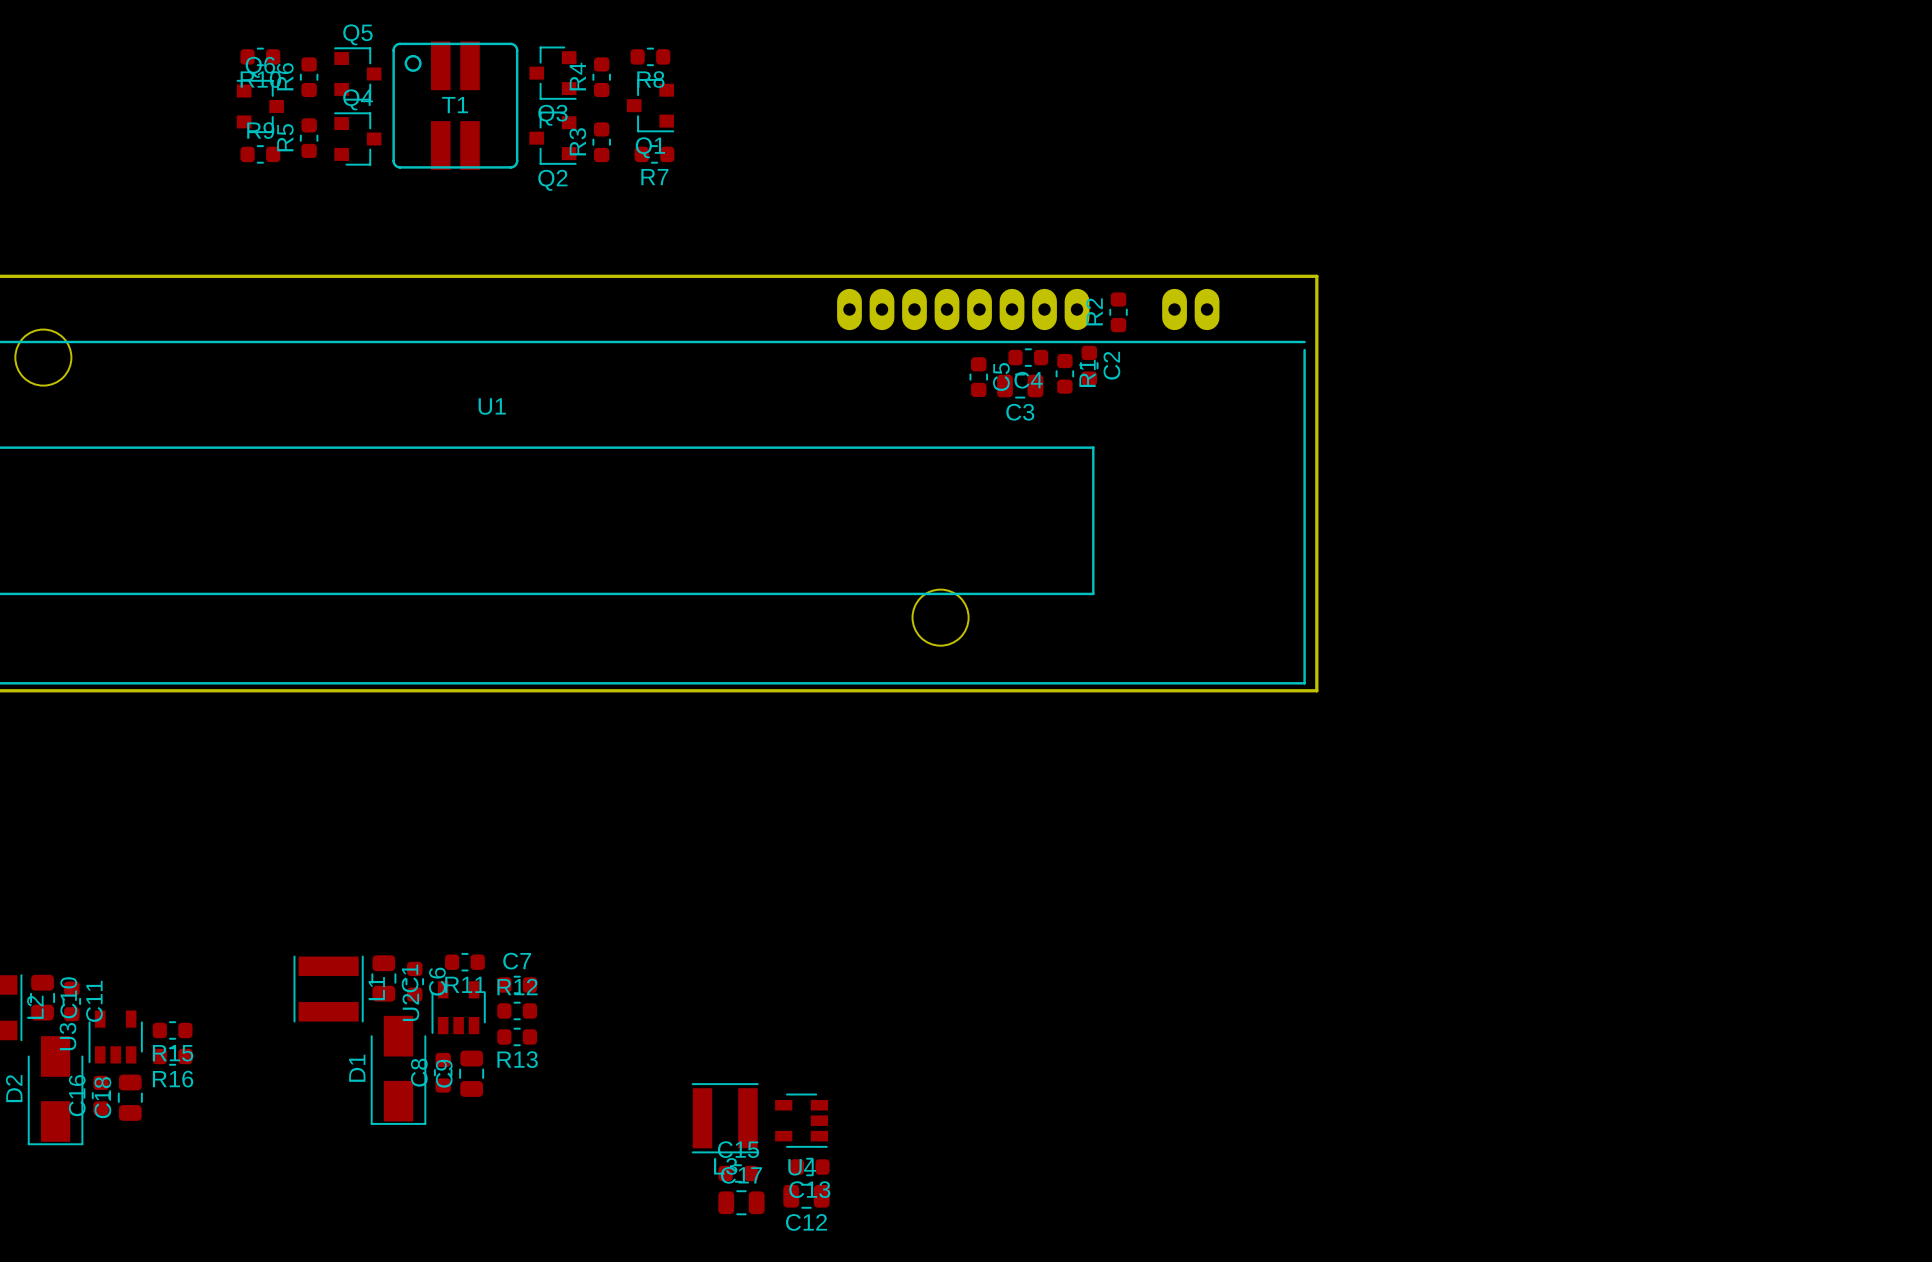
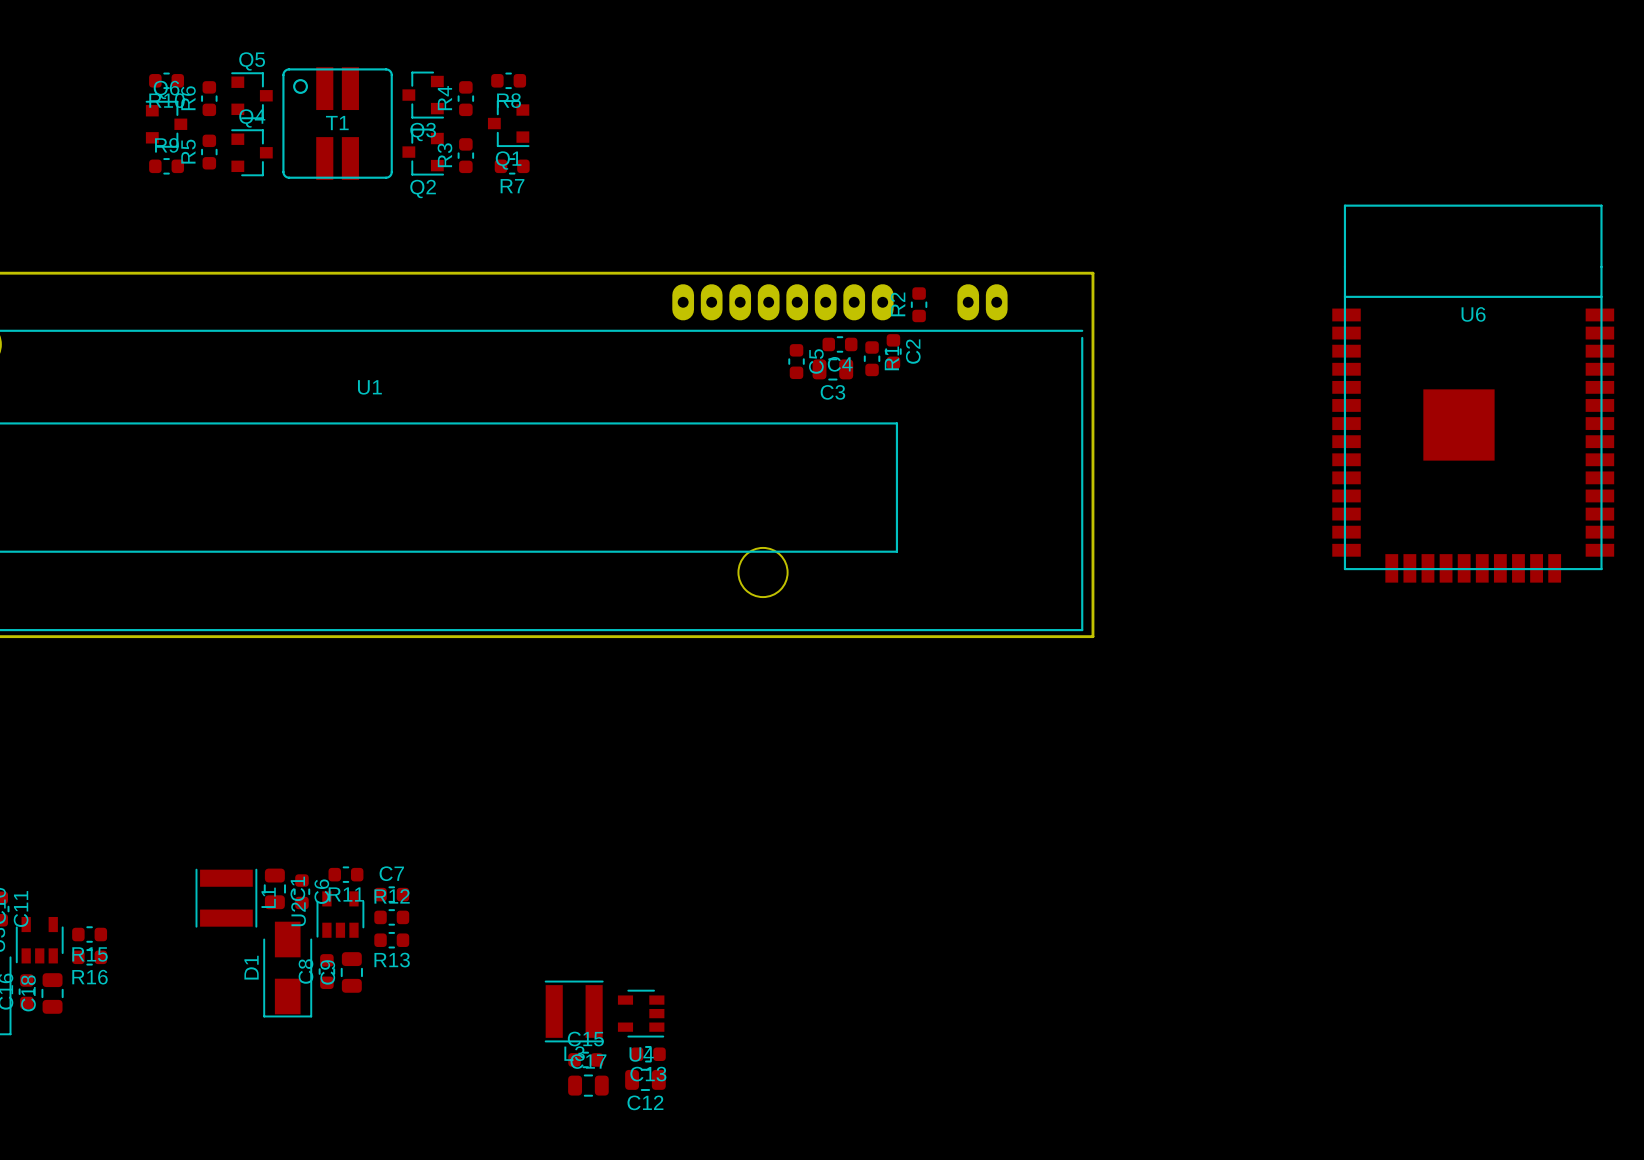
U6: none -> (1473, 393)

